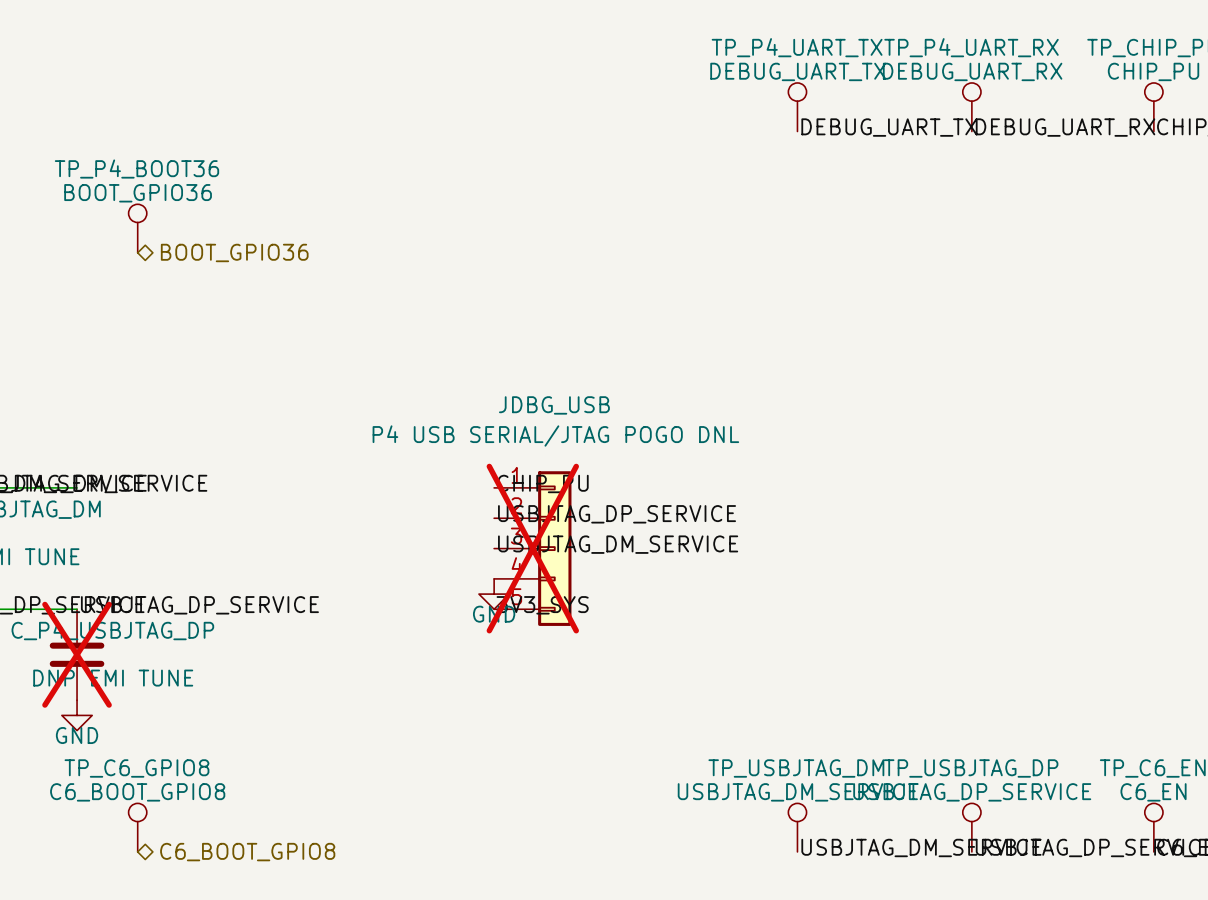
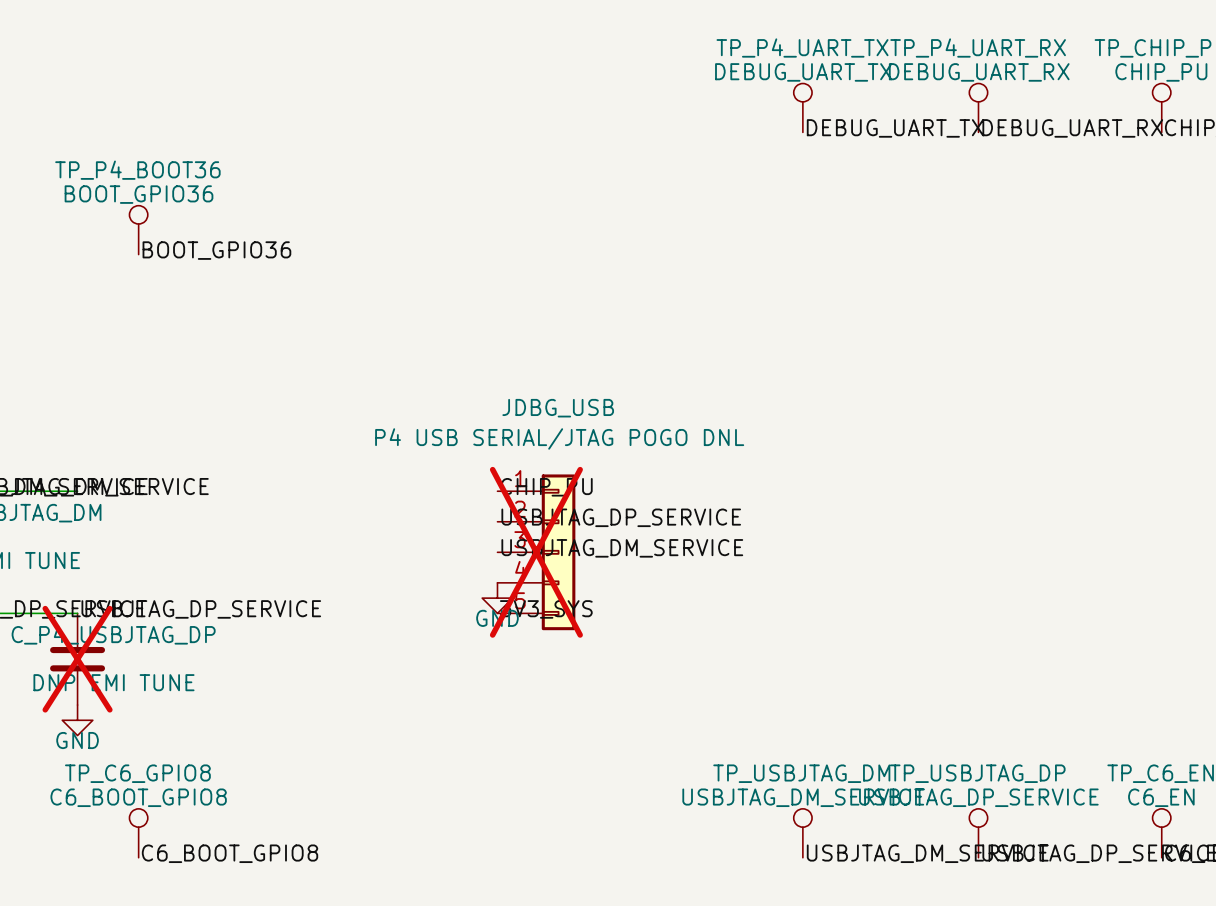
label: none -> BOOT_GPIO36 (216, 250)
hierarchical label: BOOT_GPIO36 (234, 252) -> none
label: none -> C6_BOOT_GPIO8 (230, 853)
hierarchical label: C6_BOOT_GPIO8 (247, 852) -> none

